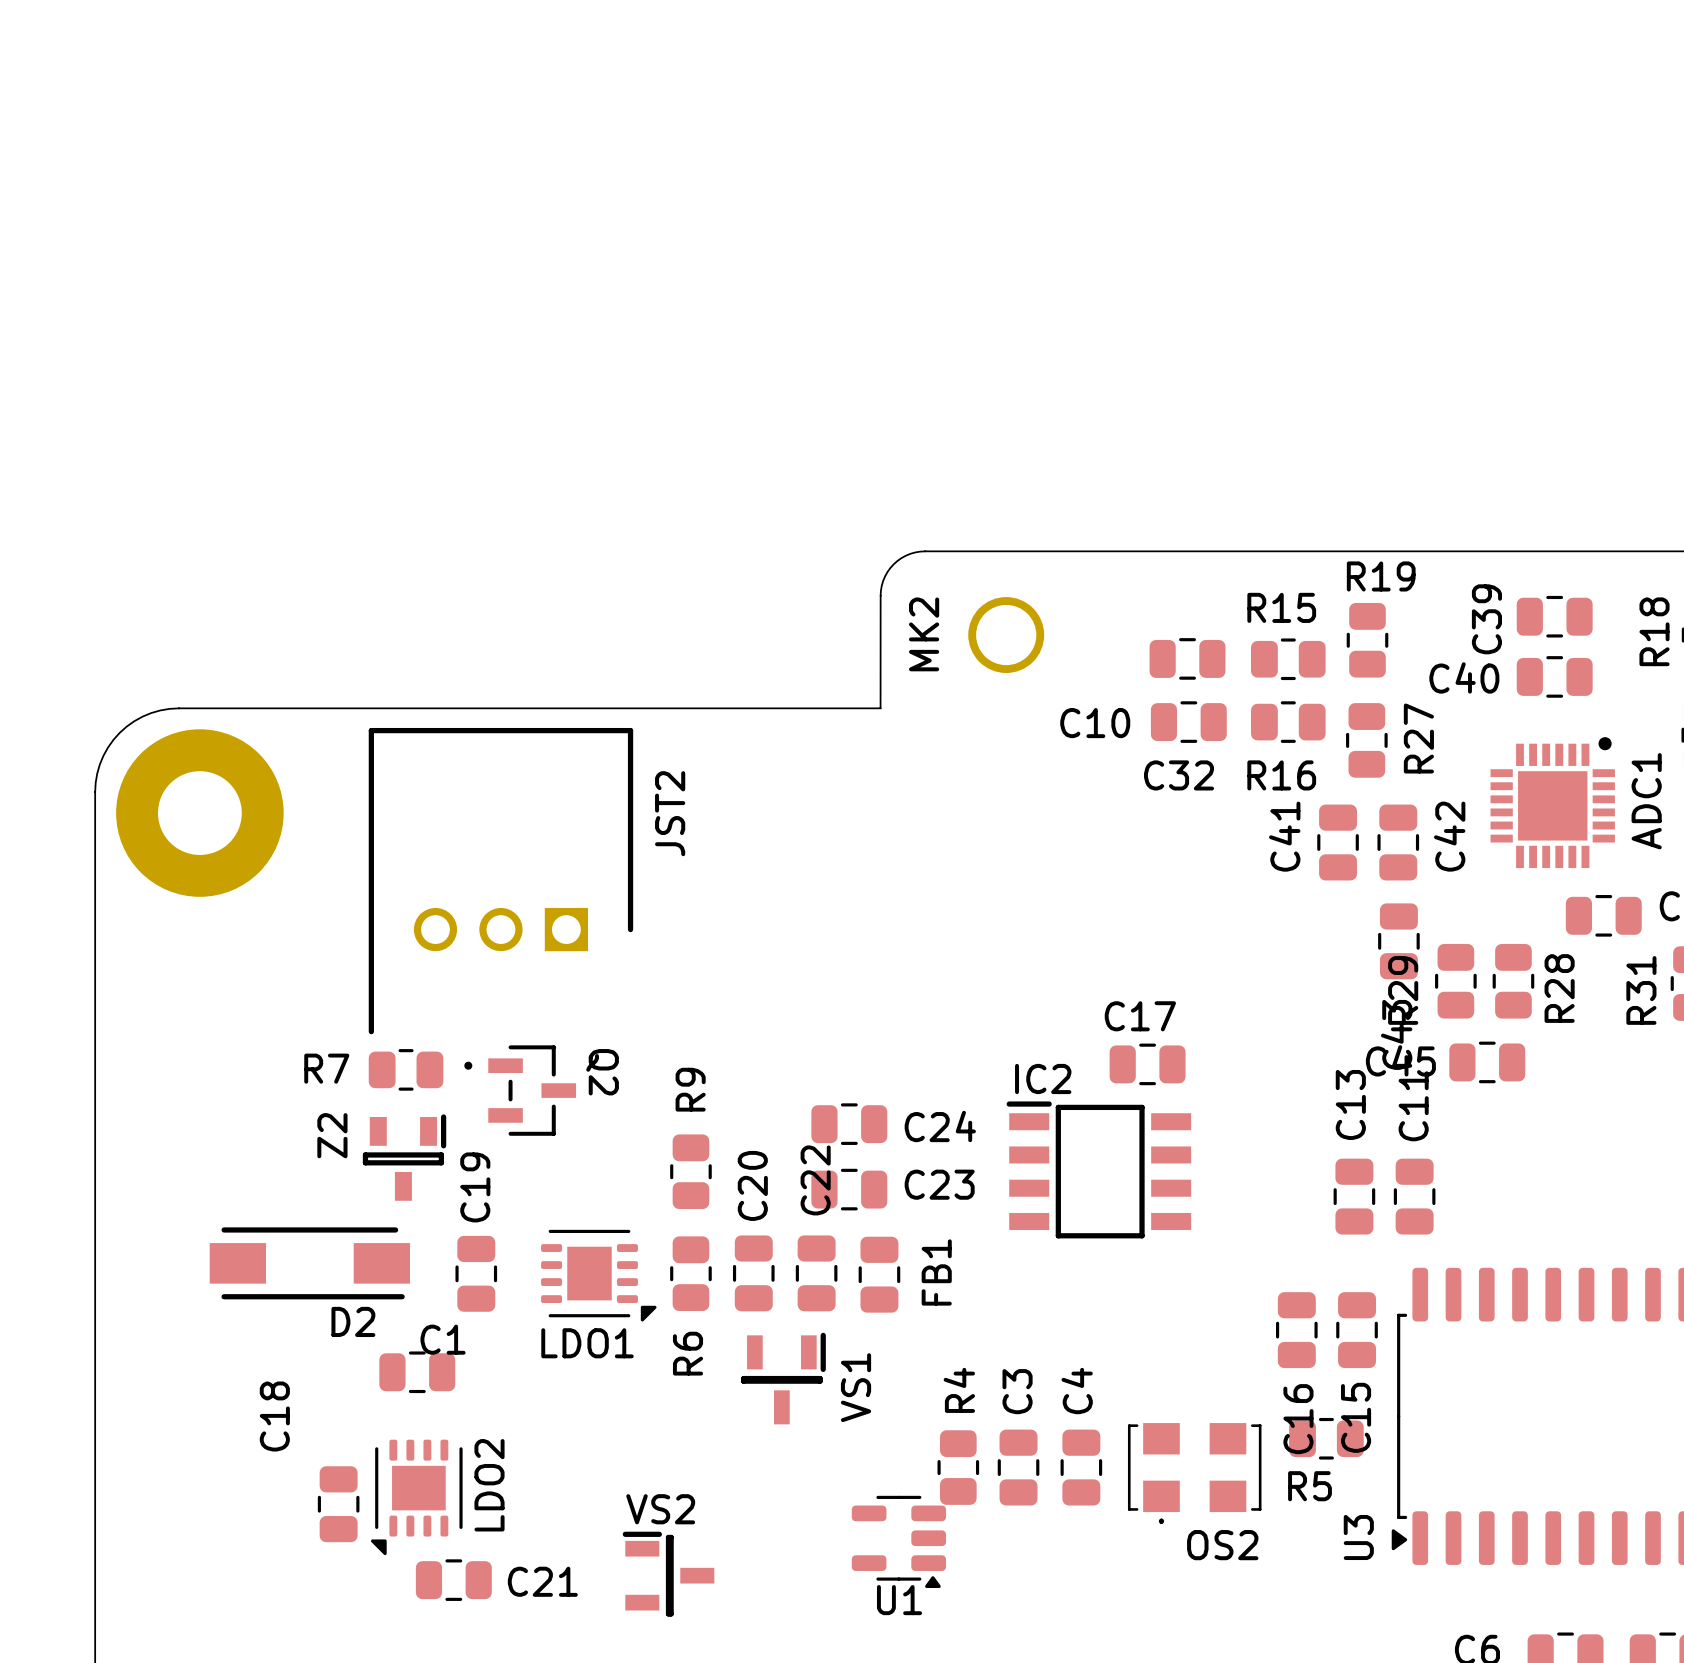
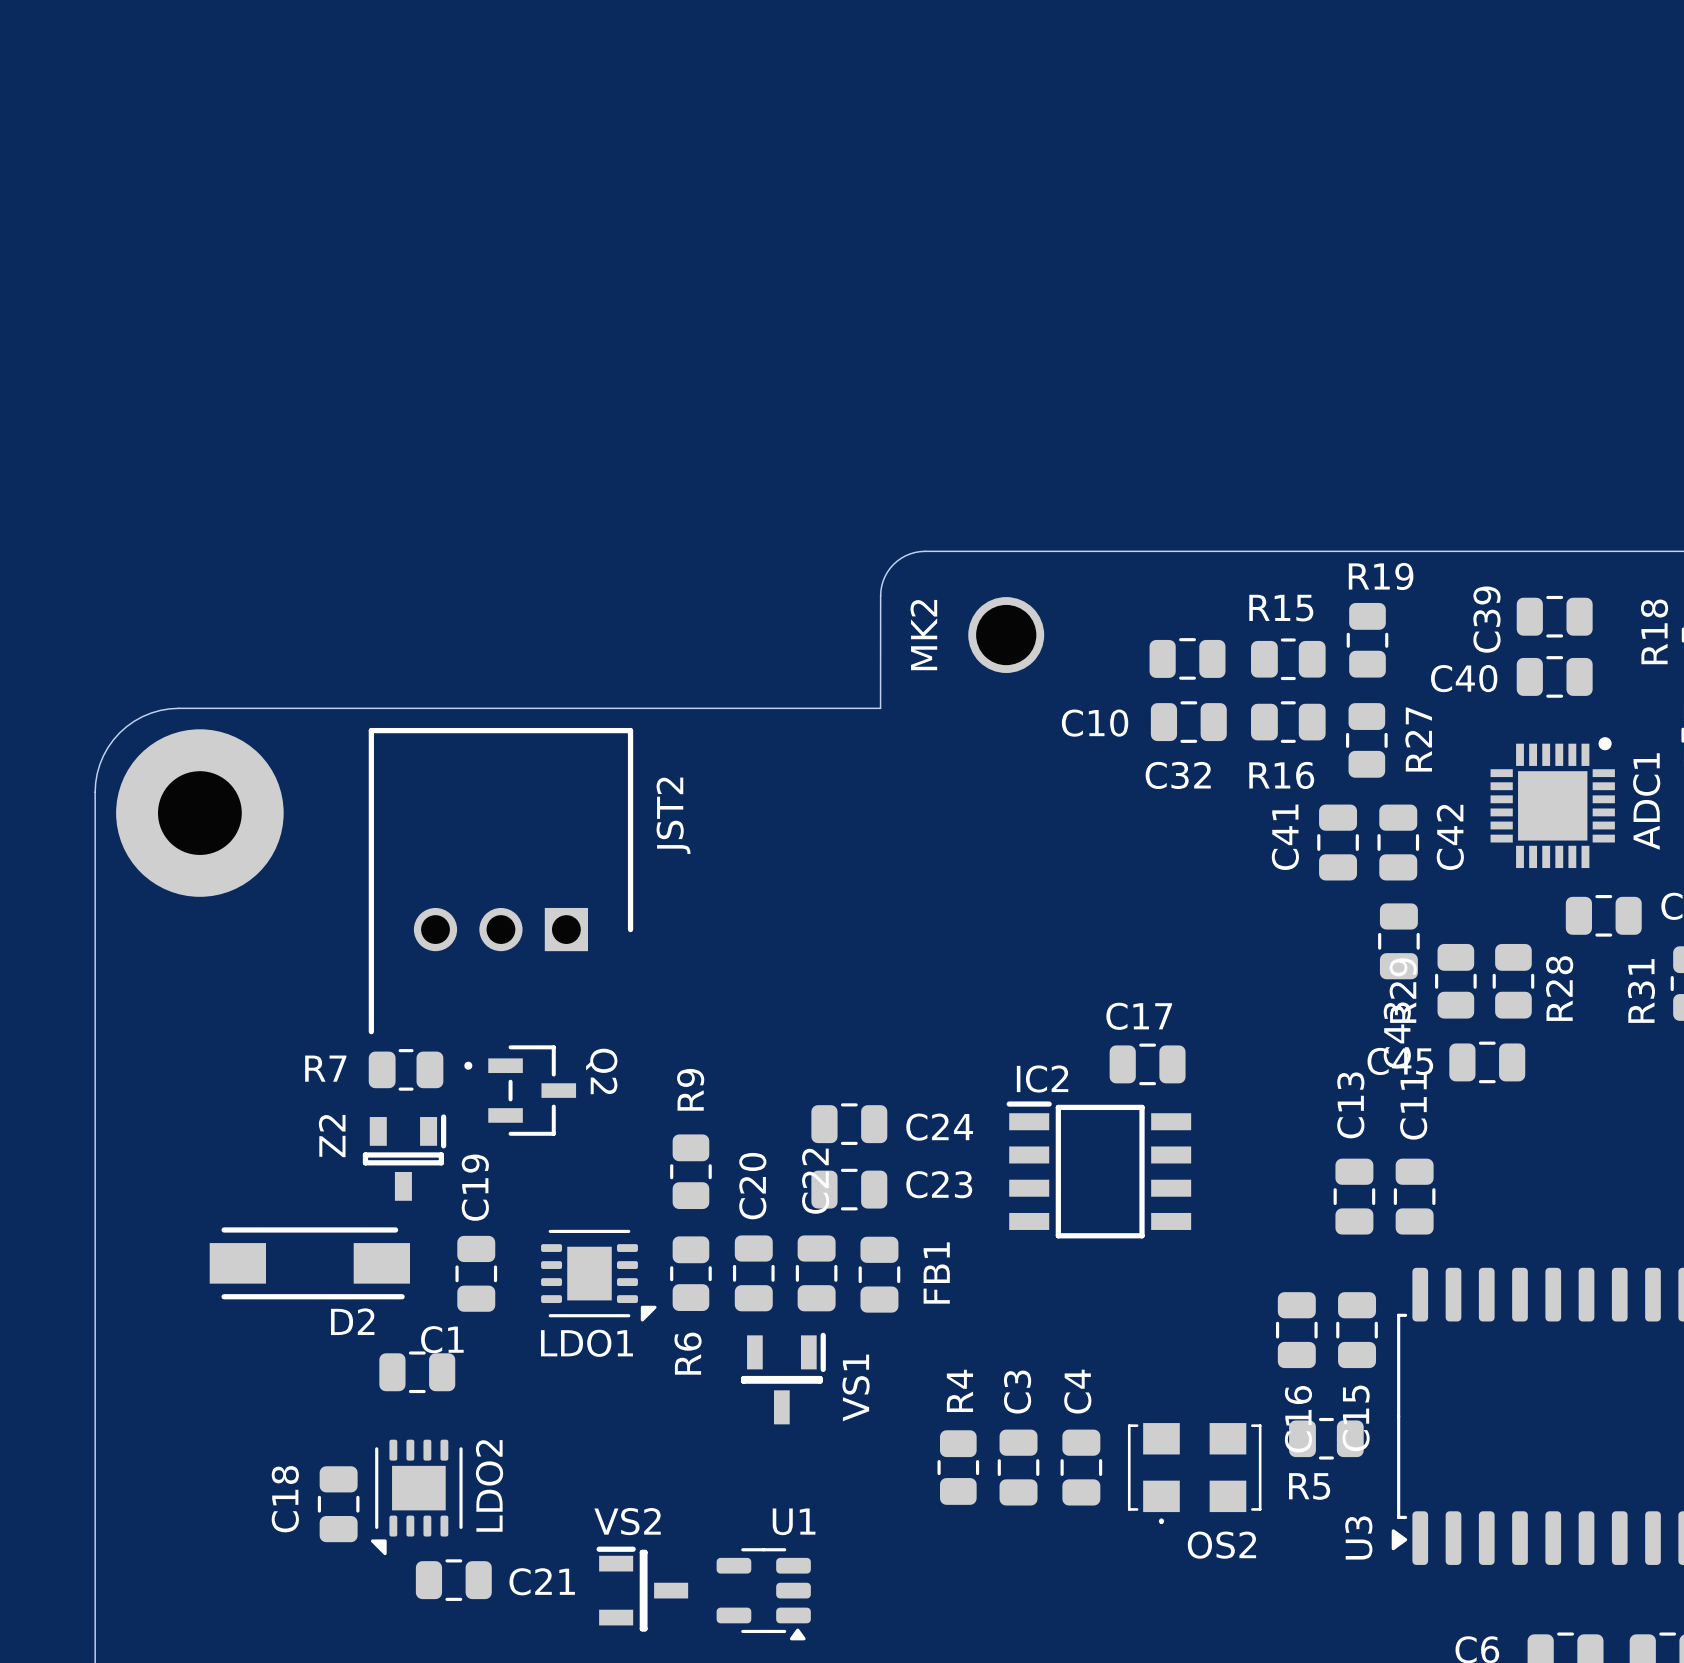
C18 name position: C18 (274, 1416) -> C18 (285, 1499)
VS2 name position: VS2 (660, 1509) -> VS2 (627, 1521)
U1 position: (898, 1541) -> (763, 1594)
VS2 position: (668, 1574) -> (642, 1589)
U1 name position: U1 (899, 1600) -> U1 (794, 1521)

